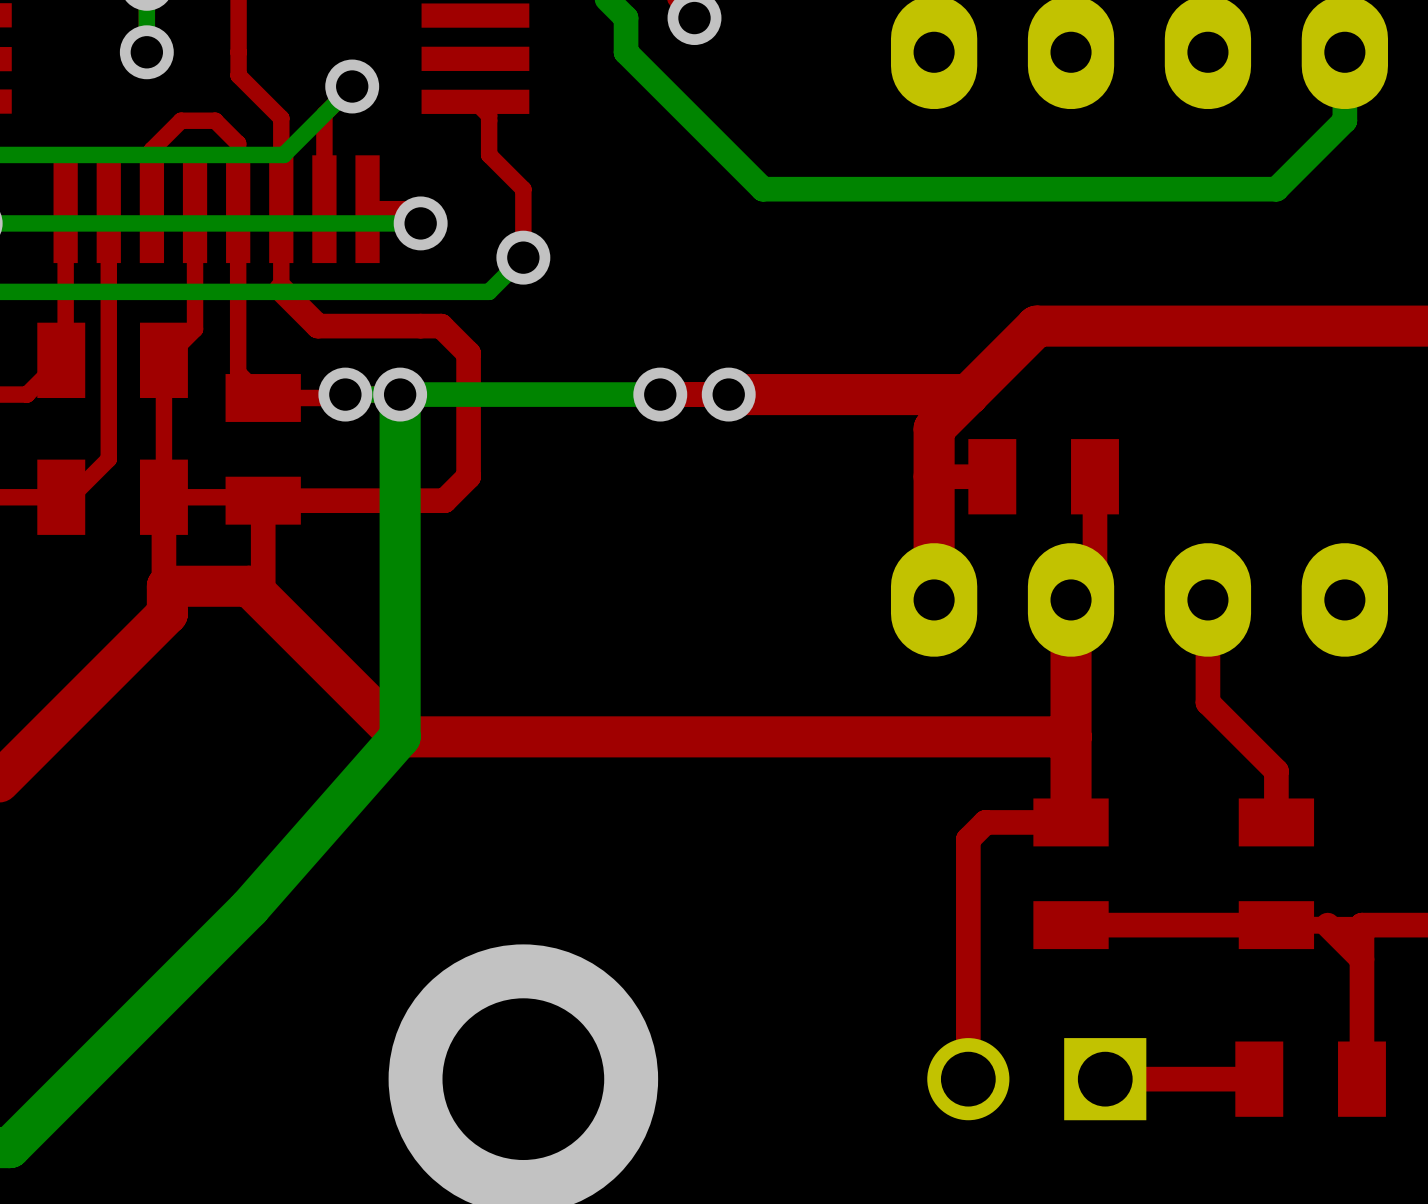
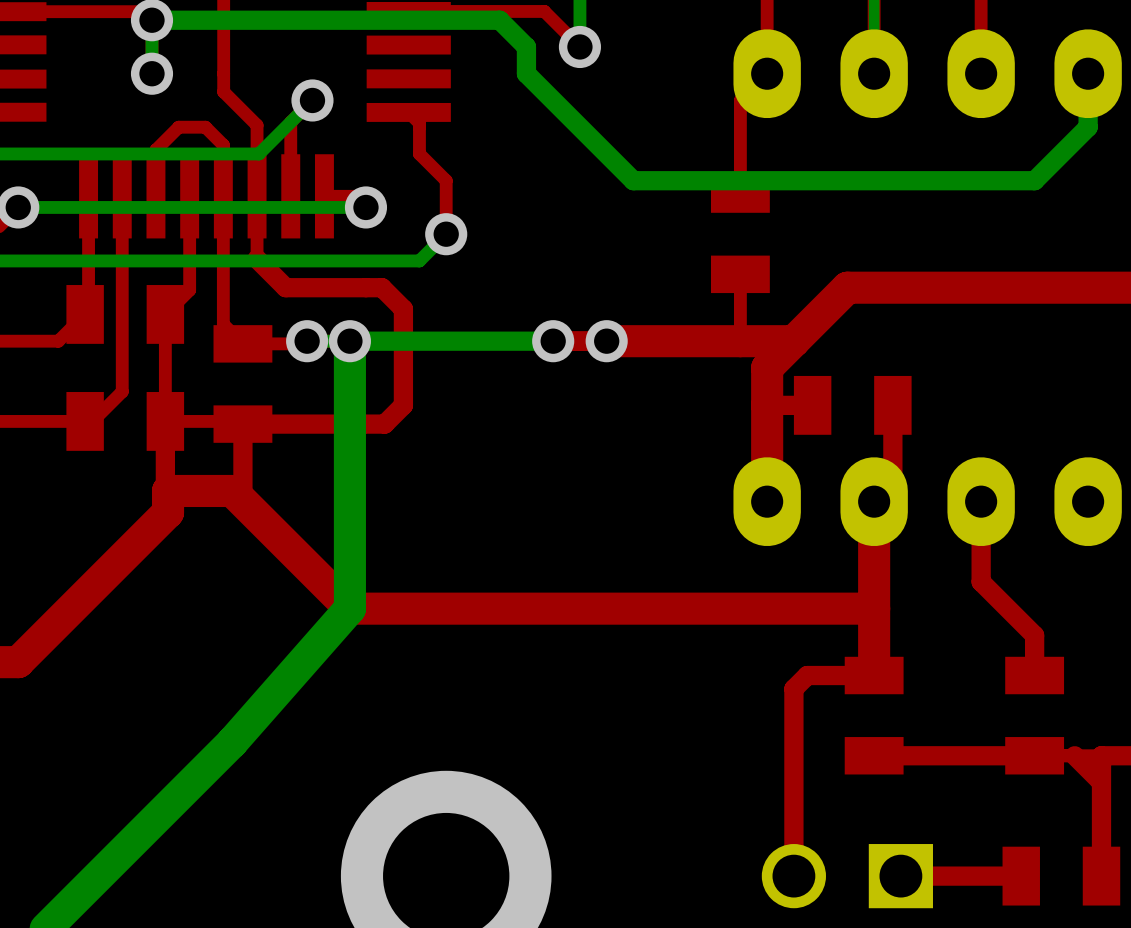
top track: none -> (767, 73) (740, 100) (740, 194)
part: none -> (740, 234)
top track: none -> (740, 274) (740, 341)

